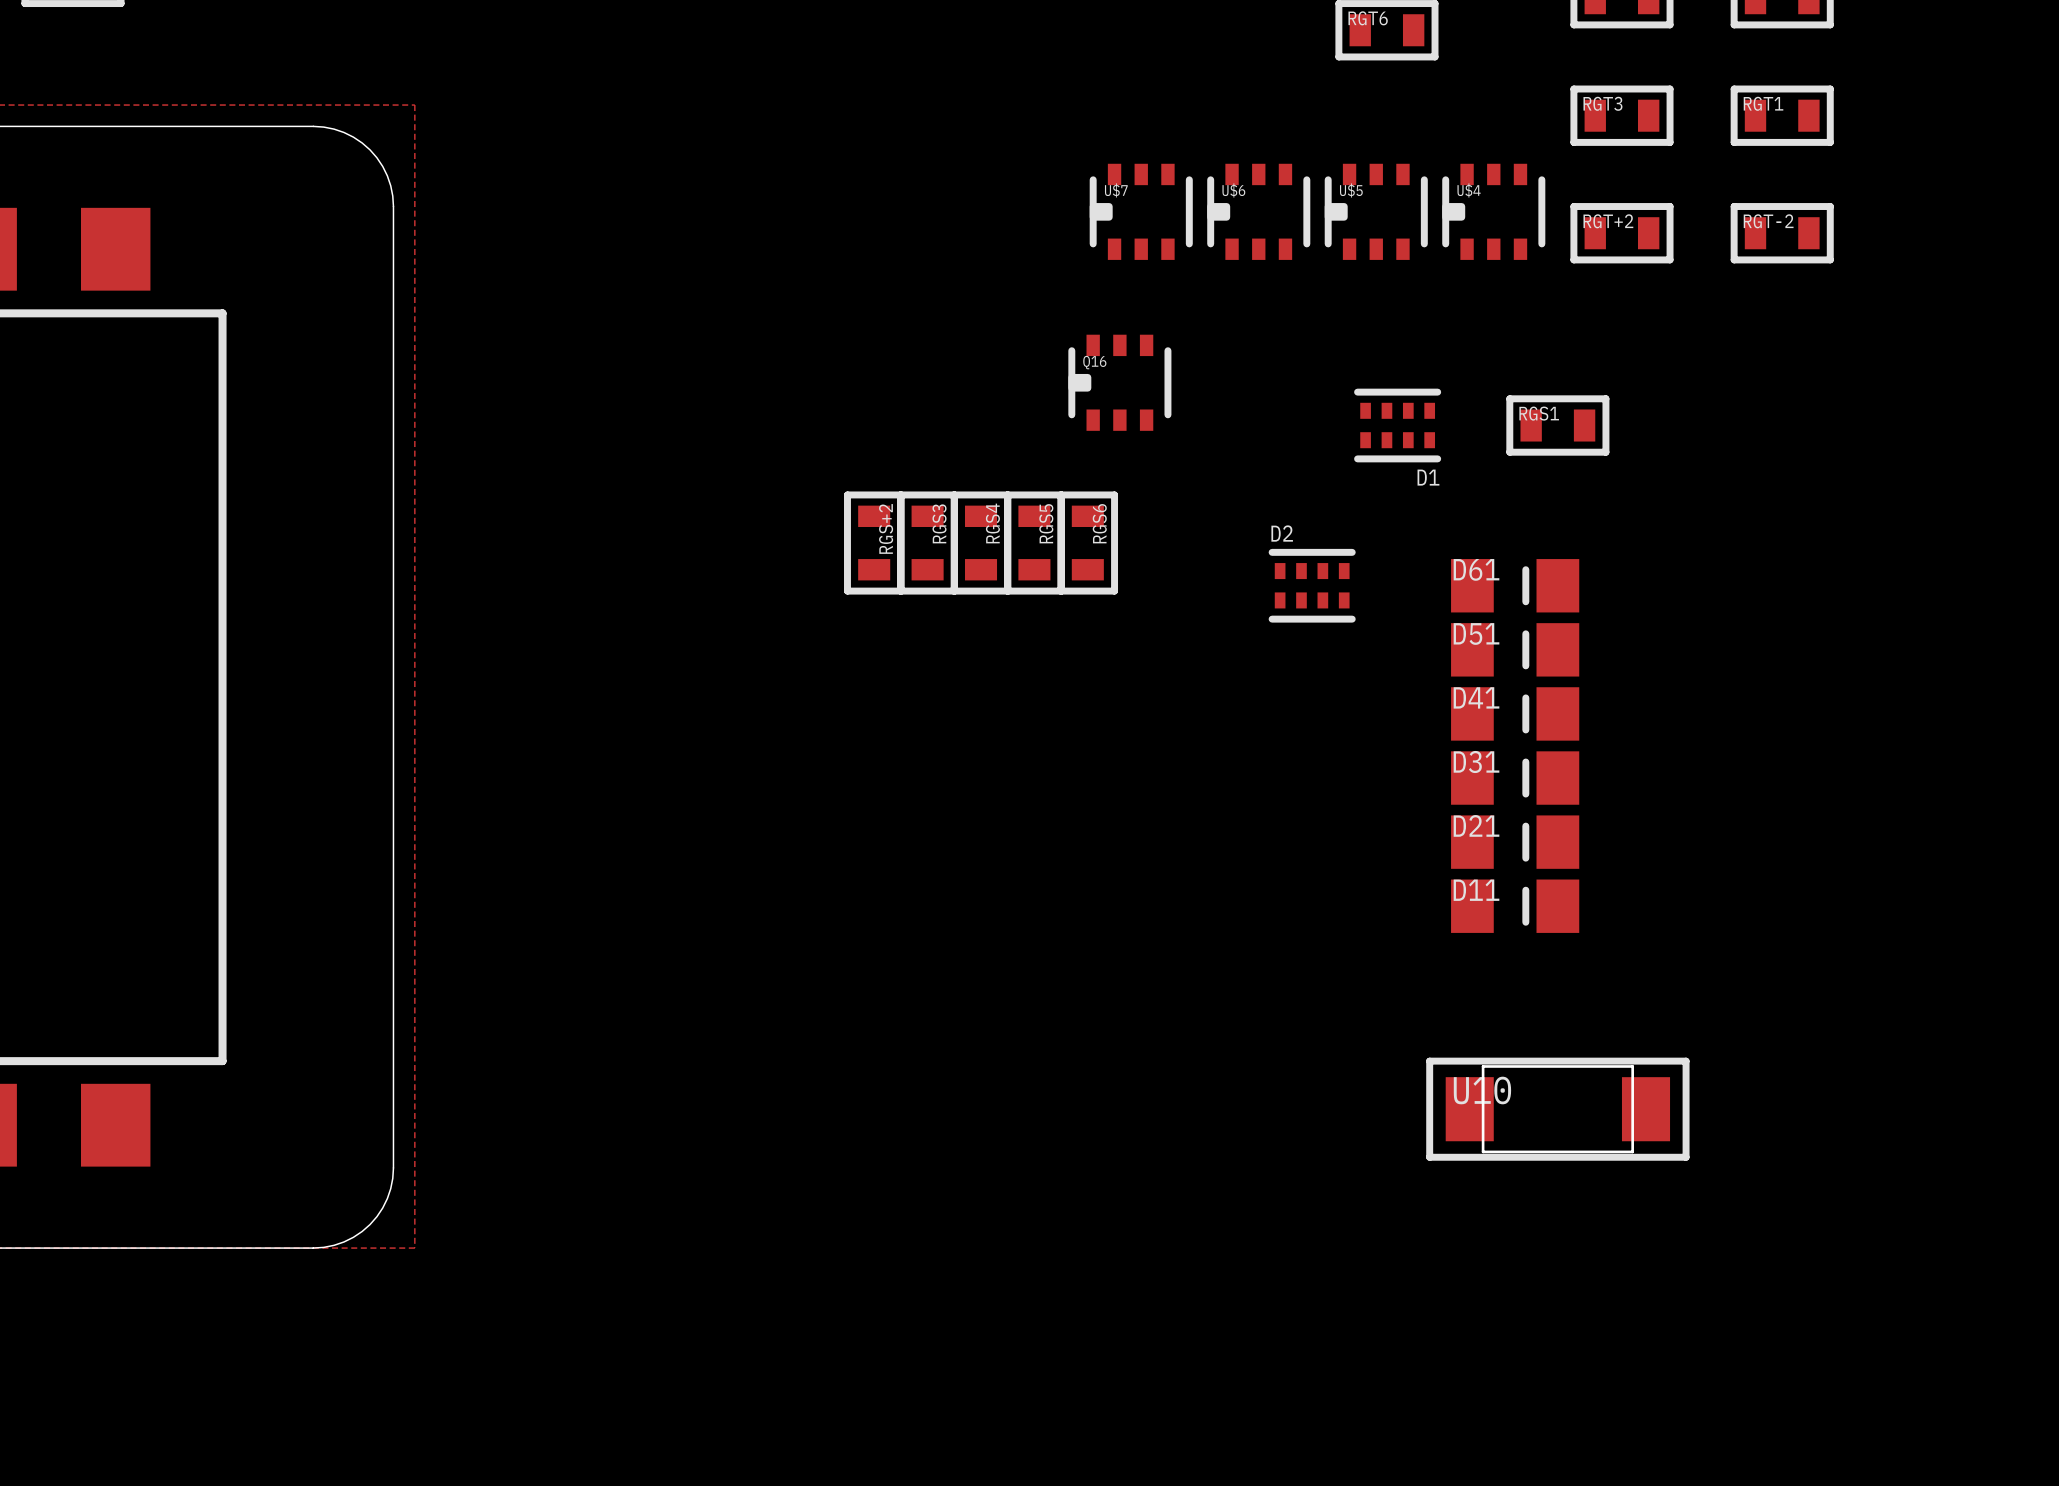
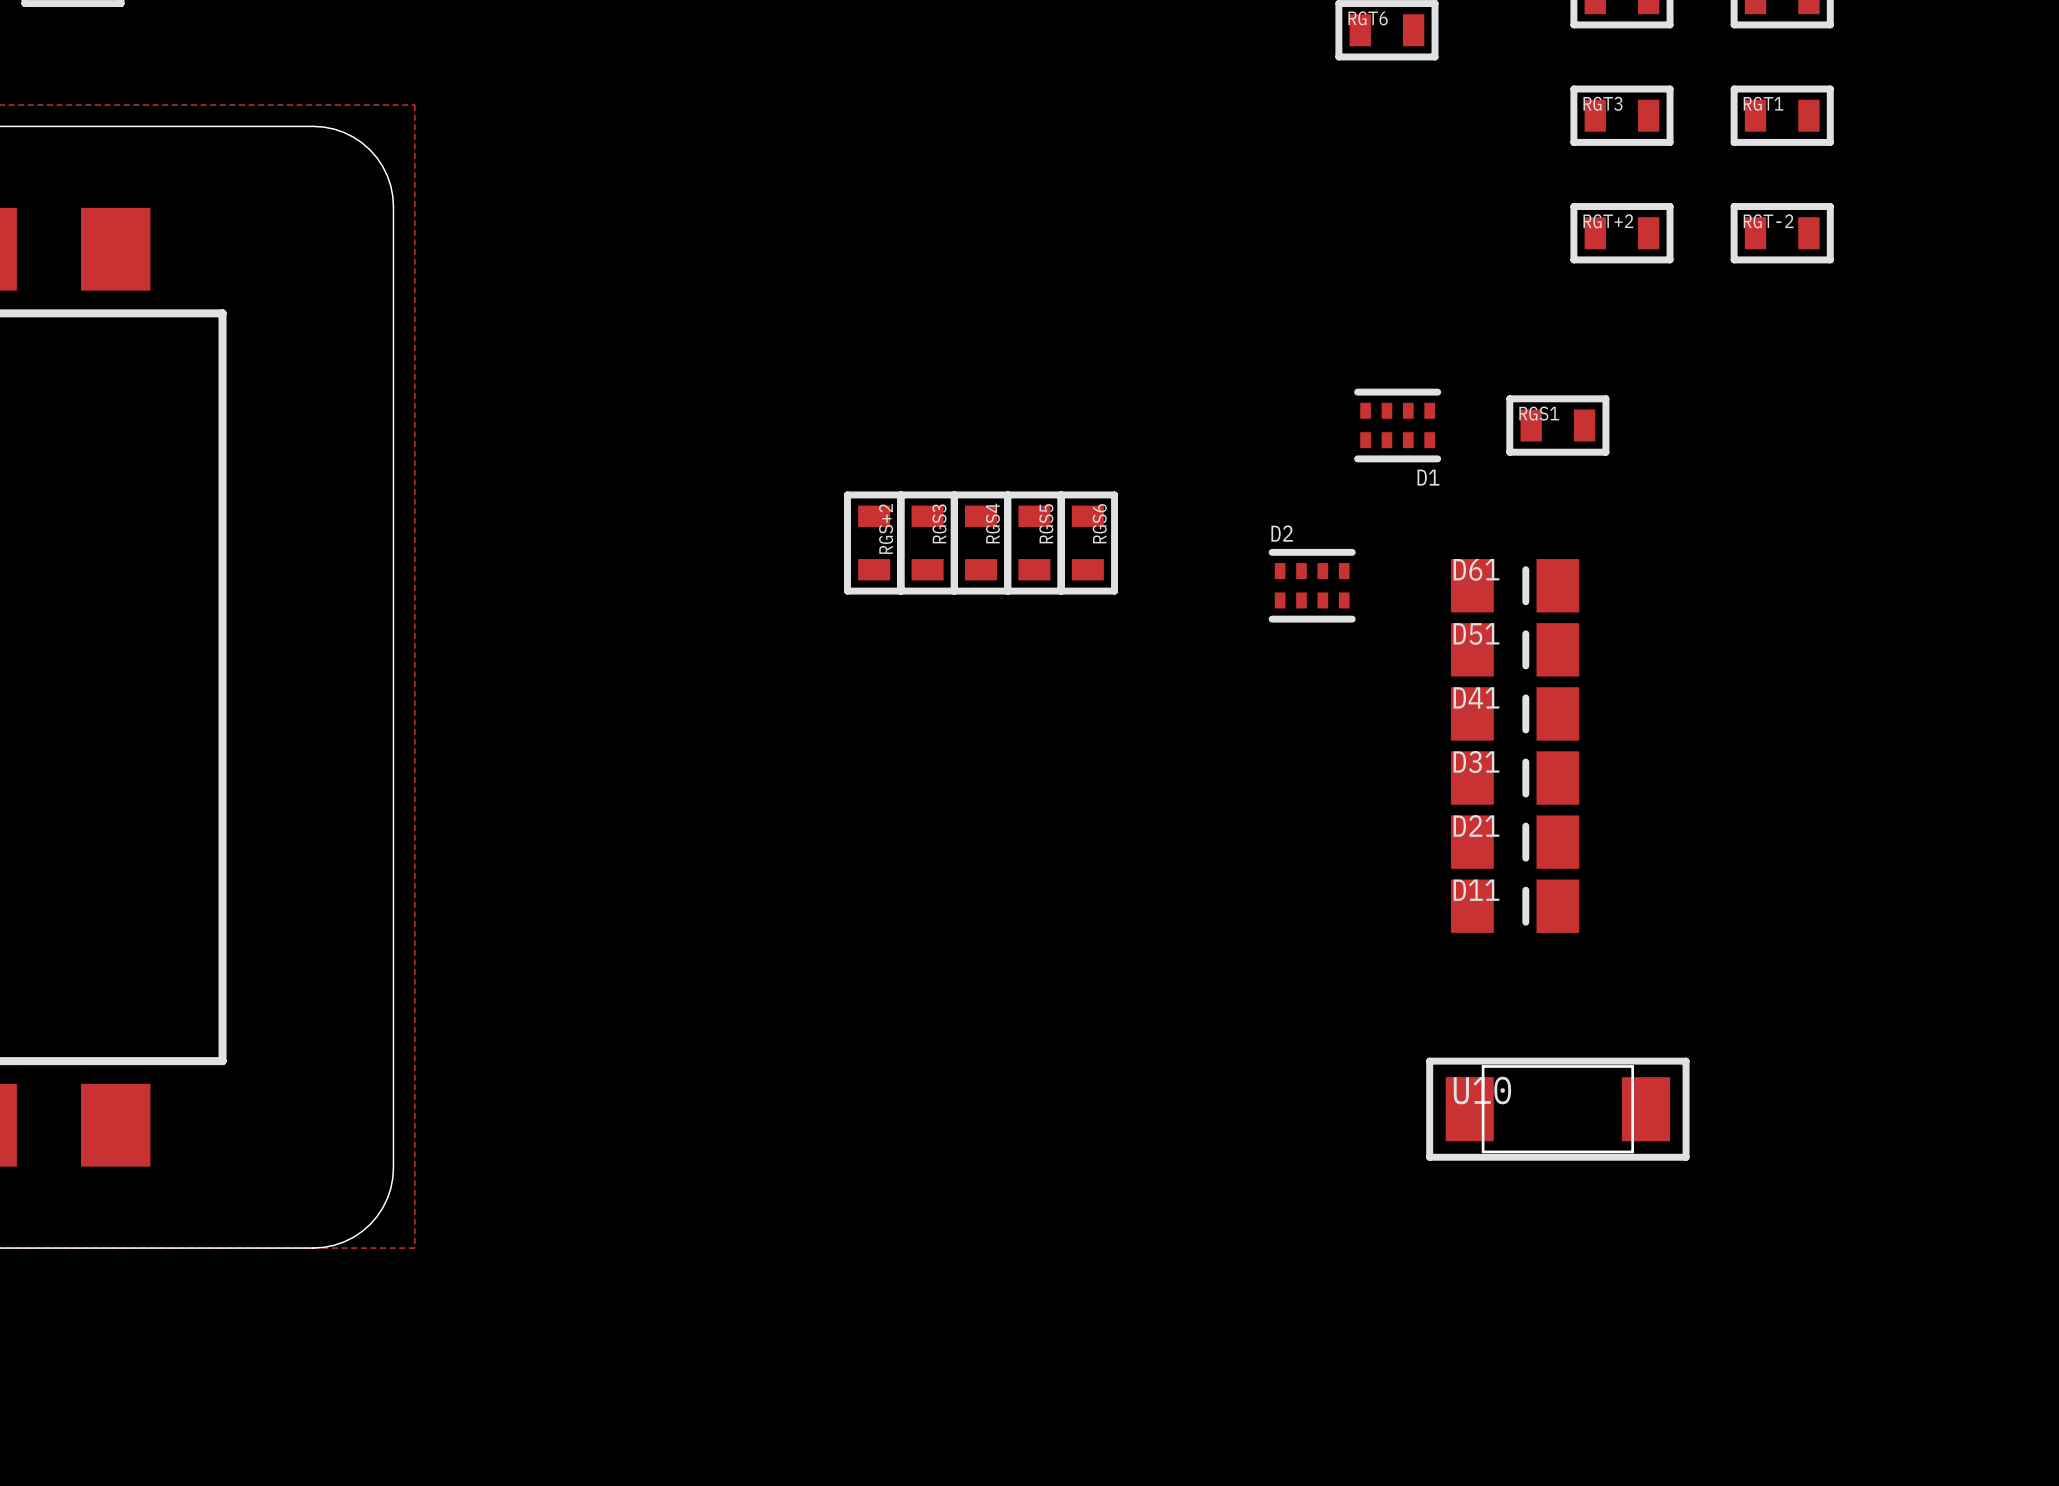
U$7: (1141, 211) -> none
U$6: (1258, 211) -> none
U$5: (1376, 211) -> none
U$4: (1493, 211) -> none
Q16: (1119, 382) -> none

